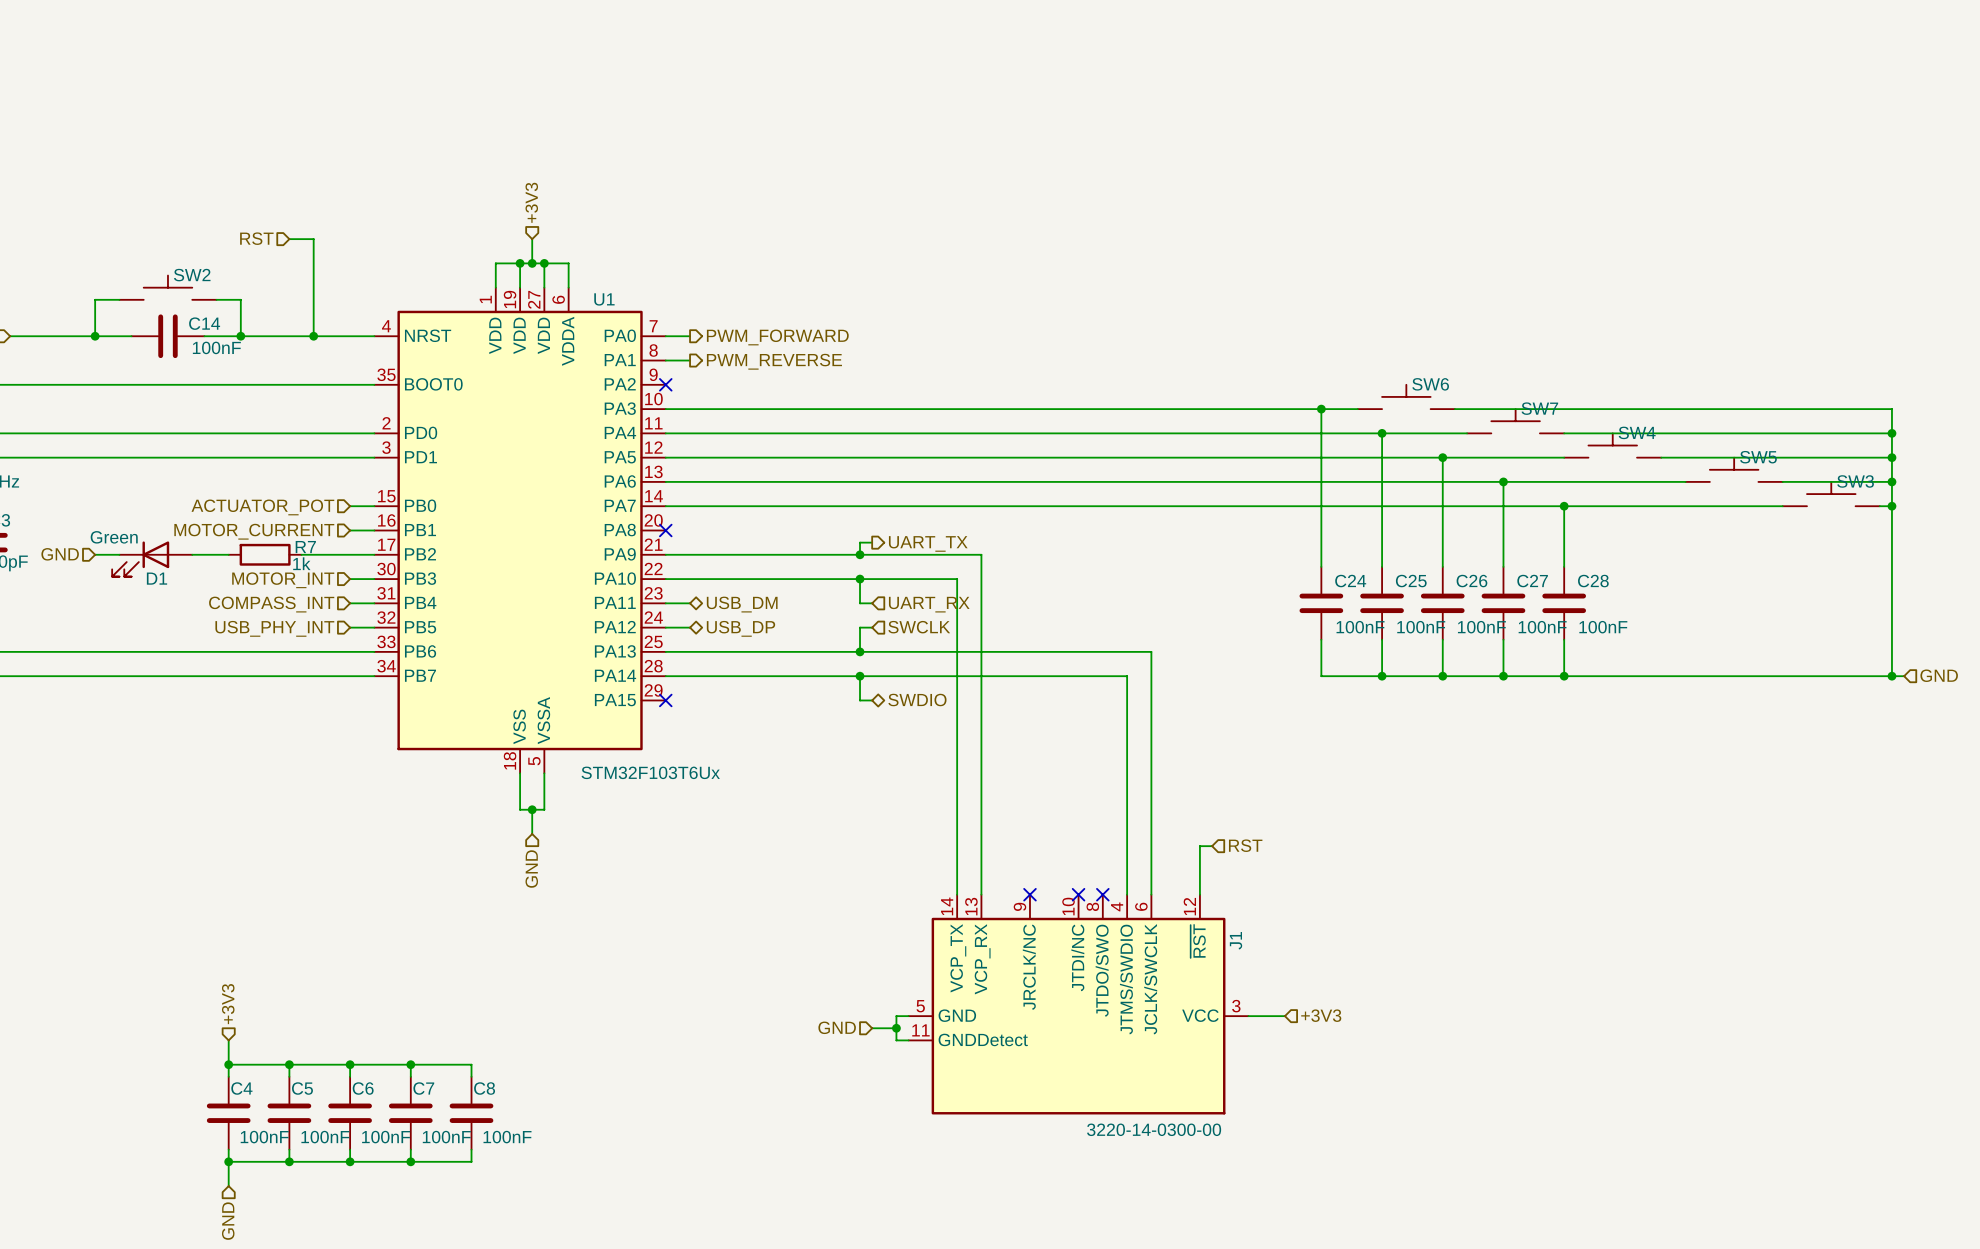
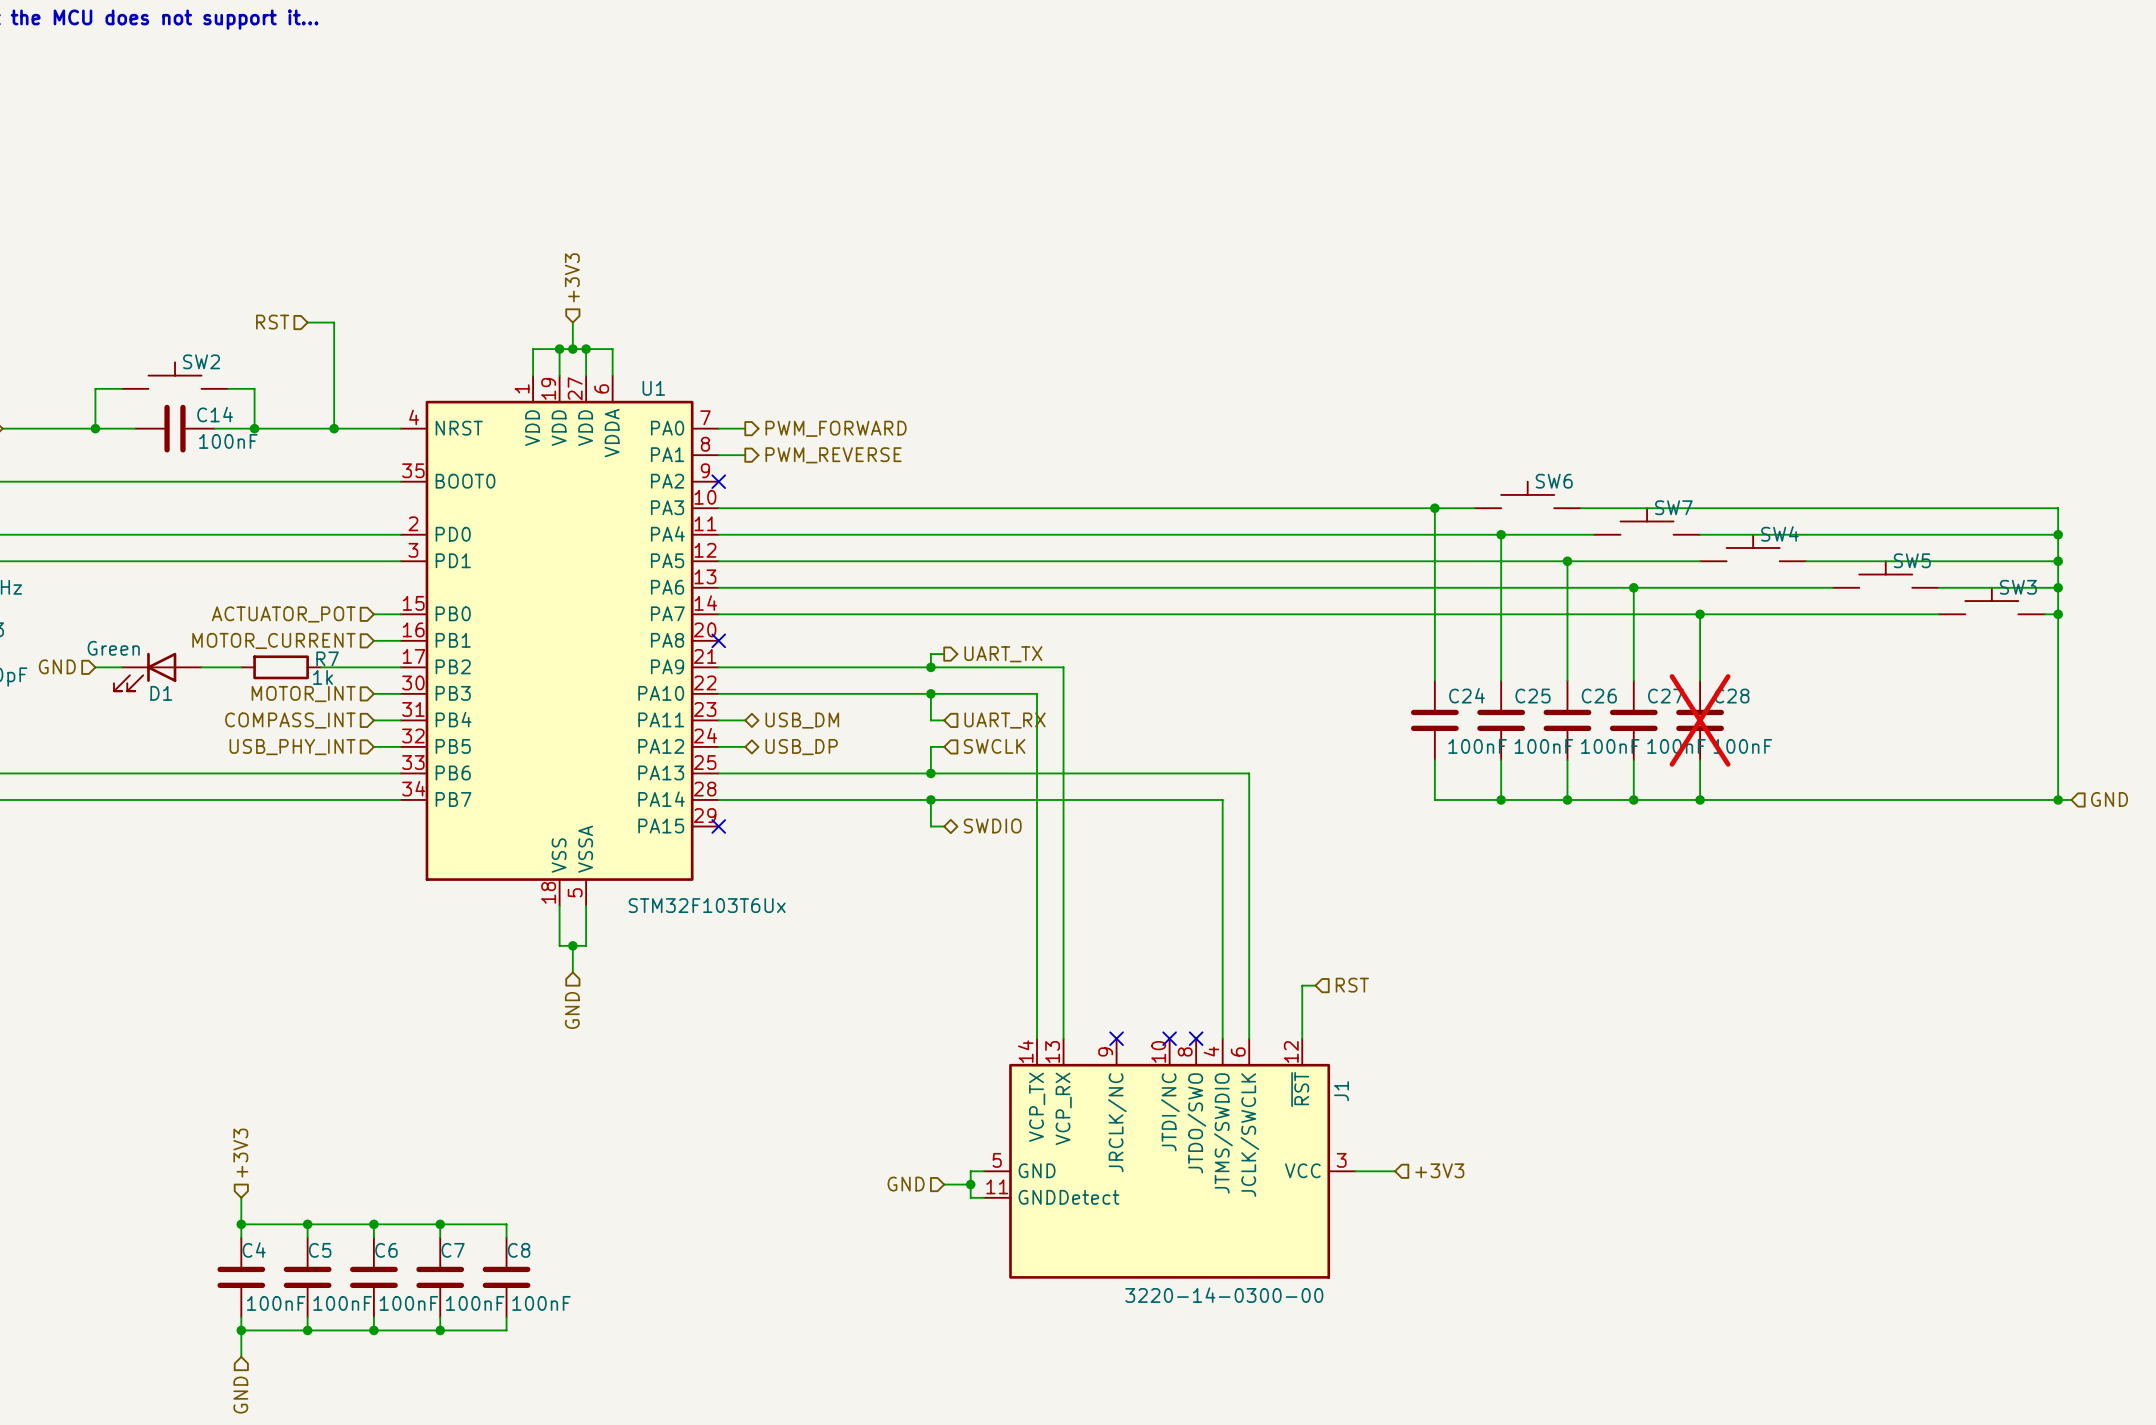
C28 do-not-place cross: none -> (1700, 720)

